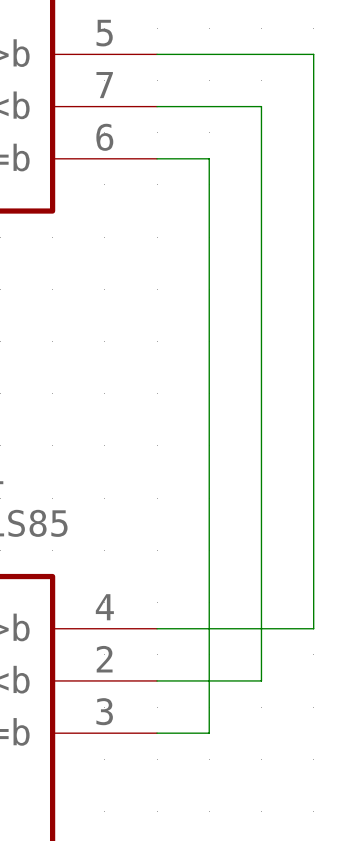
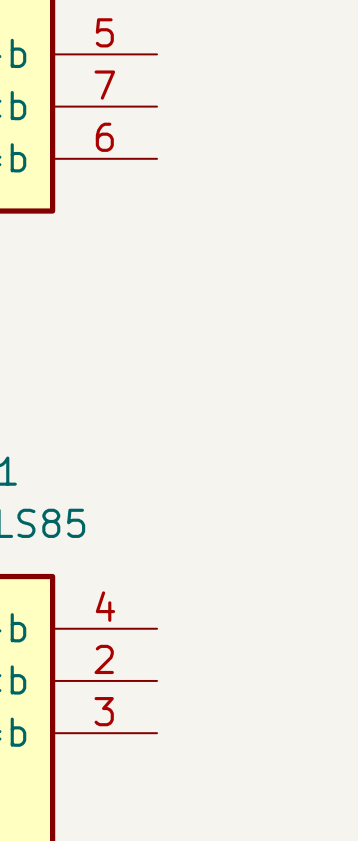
wire: (157, 54) (313, 54) (313, 628) (157, 628) -> none
wire: (157, 106) (261, 106) (261, 680) (157, 680) -> none
wire: (157, 158) (209, 158) (209, 733) (157, 733) -> none

